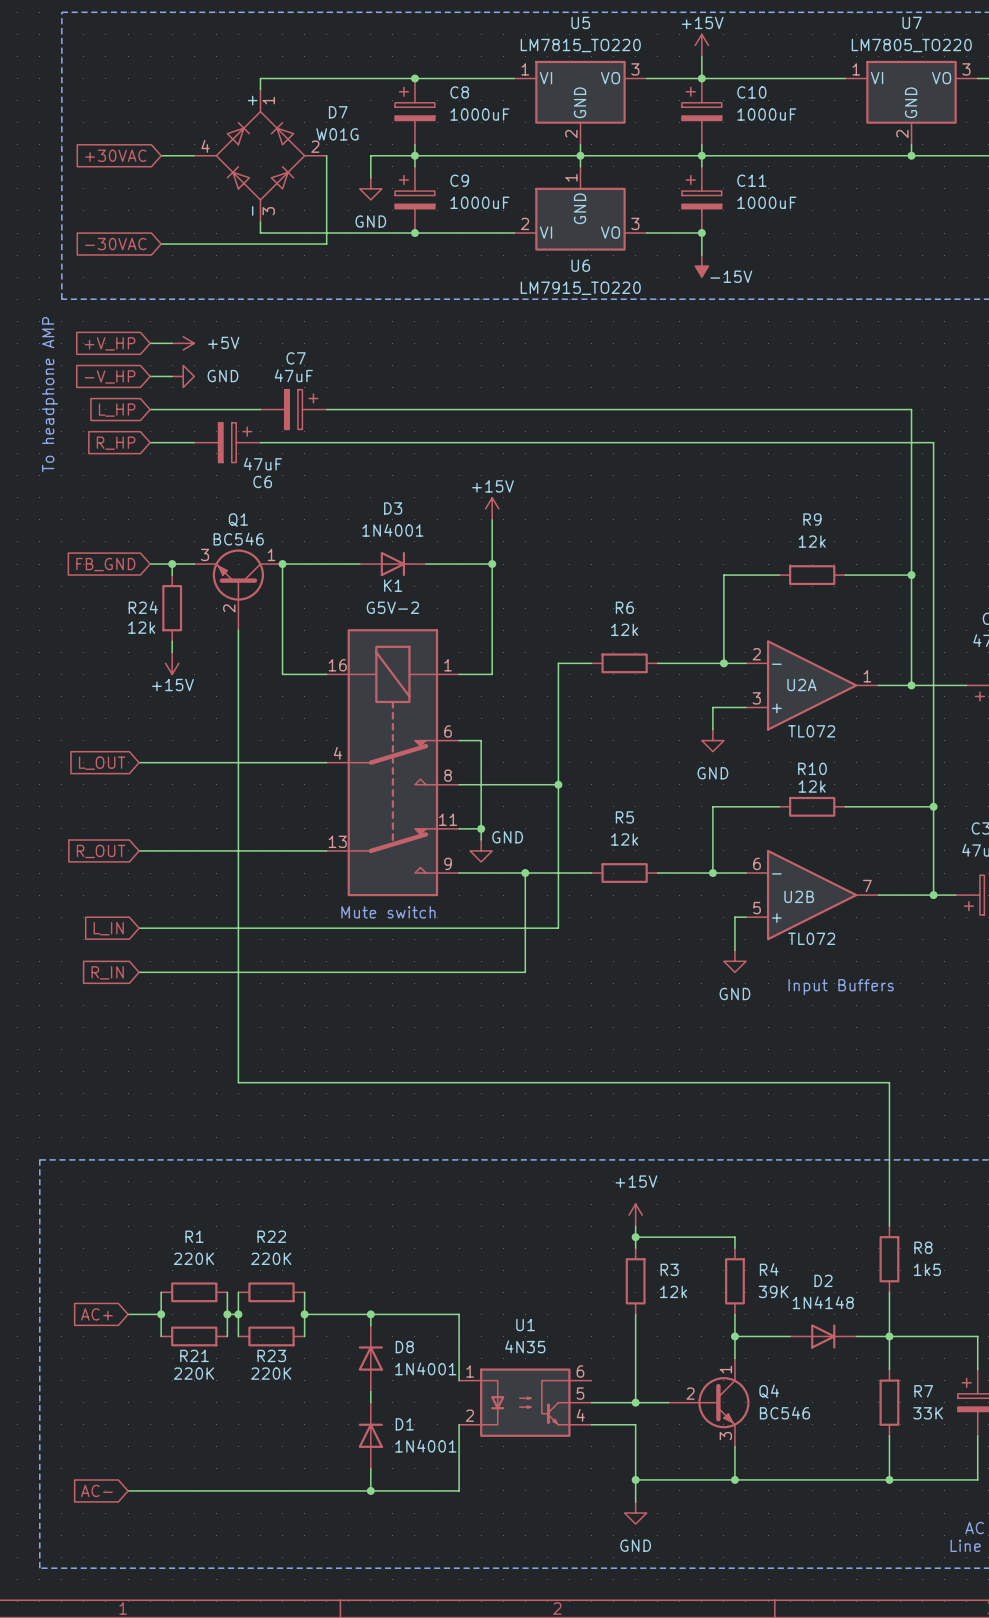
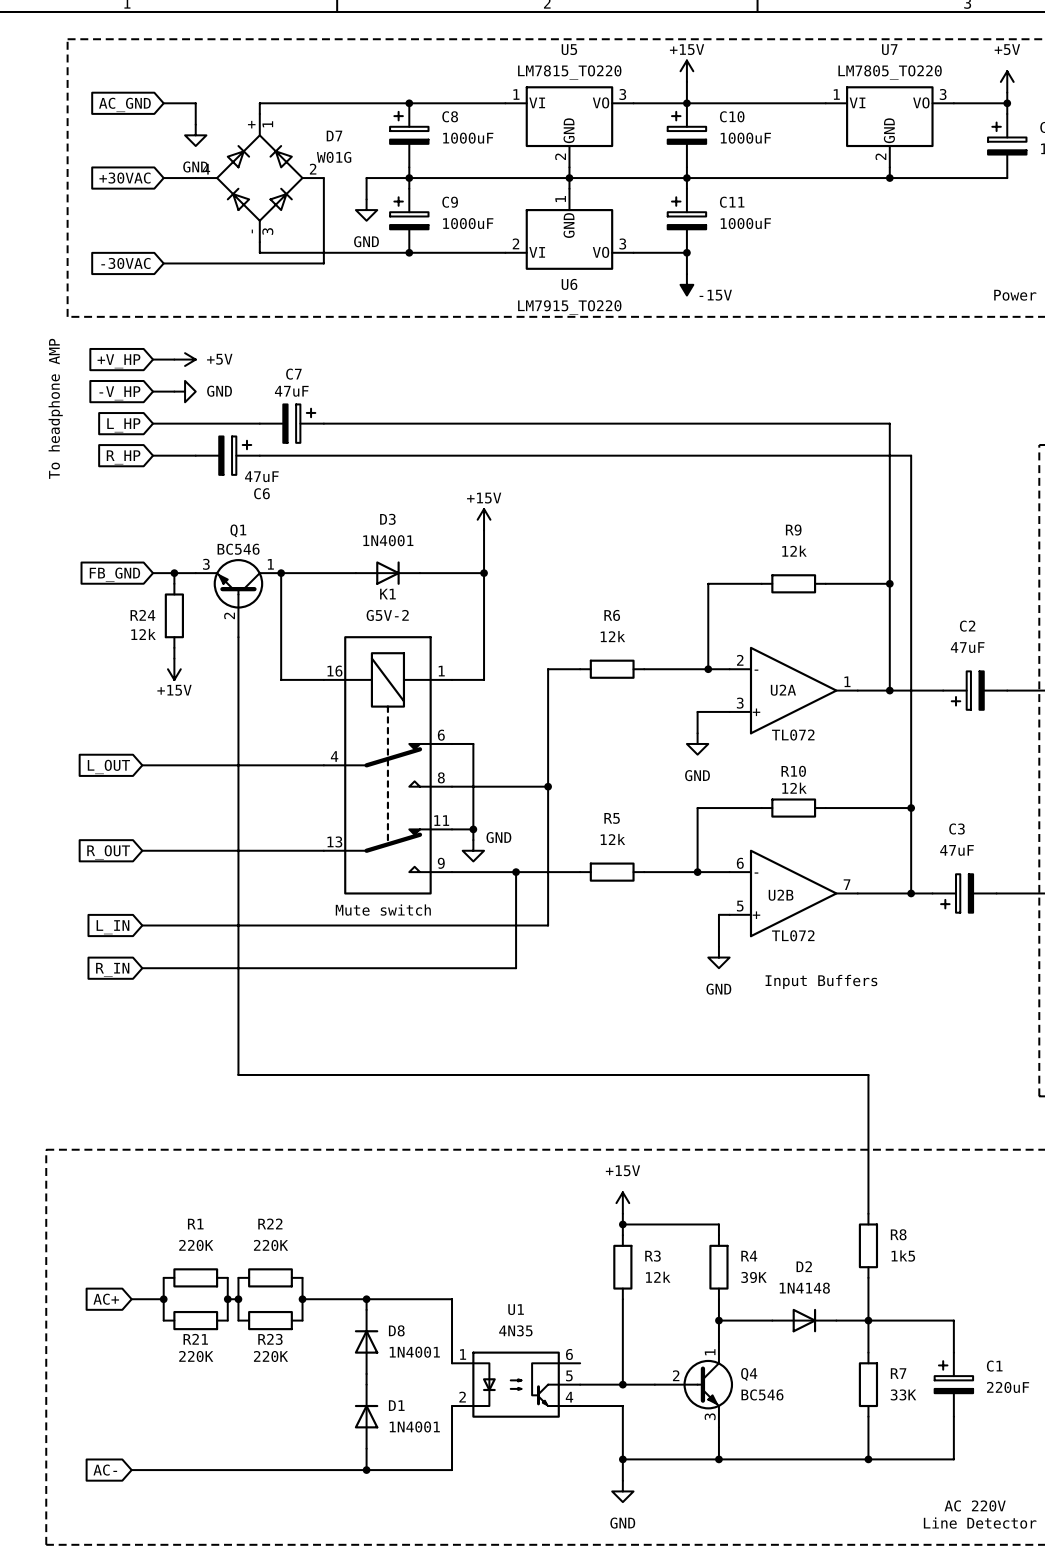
wire: none -> (163, 103) (195, 103) (195, 124)
global label: none -> AC_GND (124, 104)
power symbol: none -> GND (195, 135)

